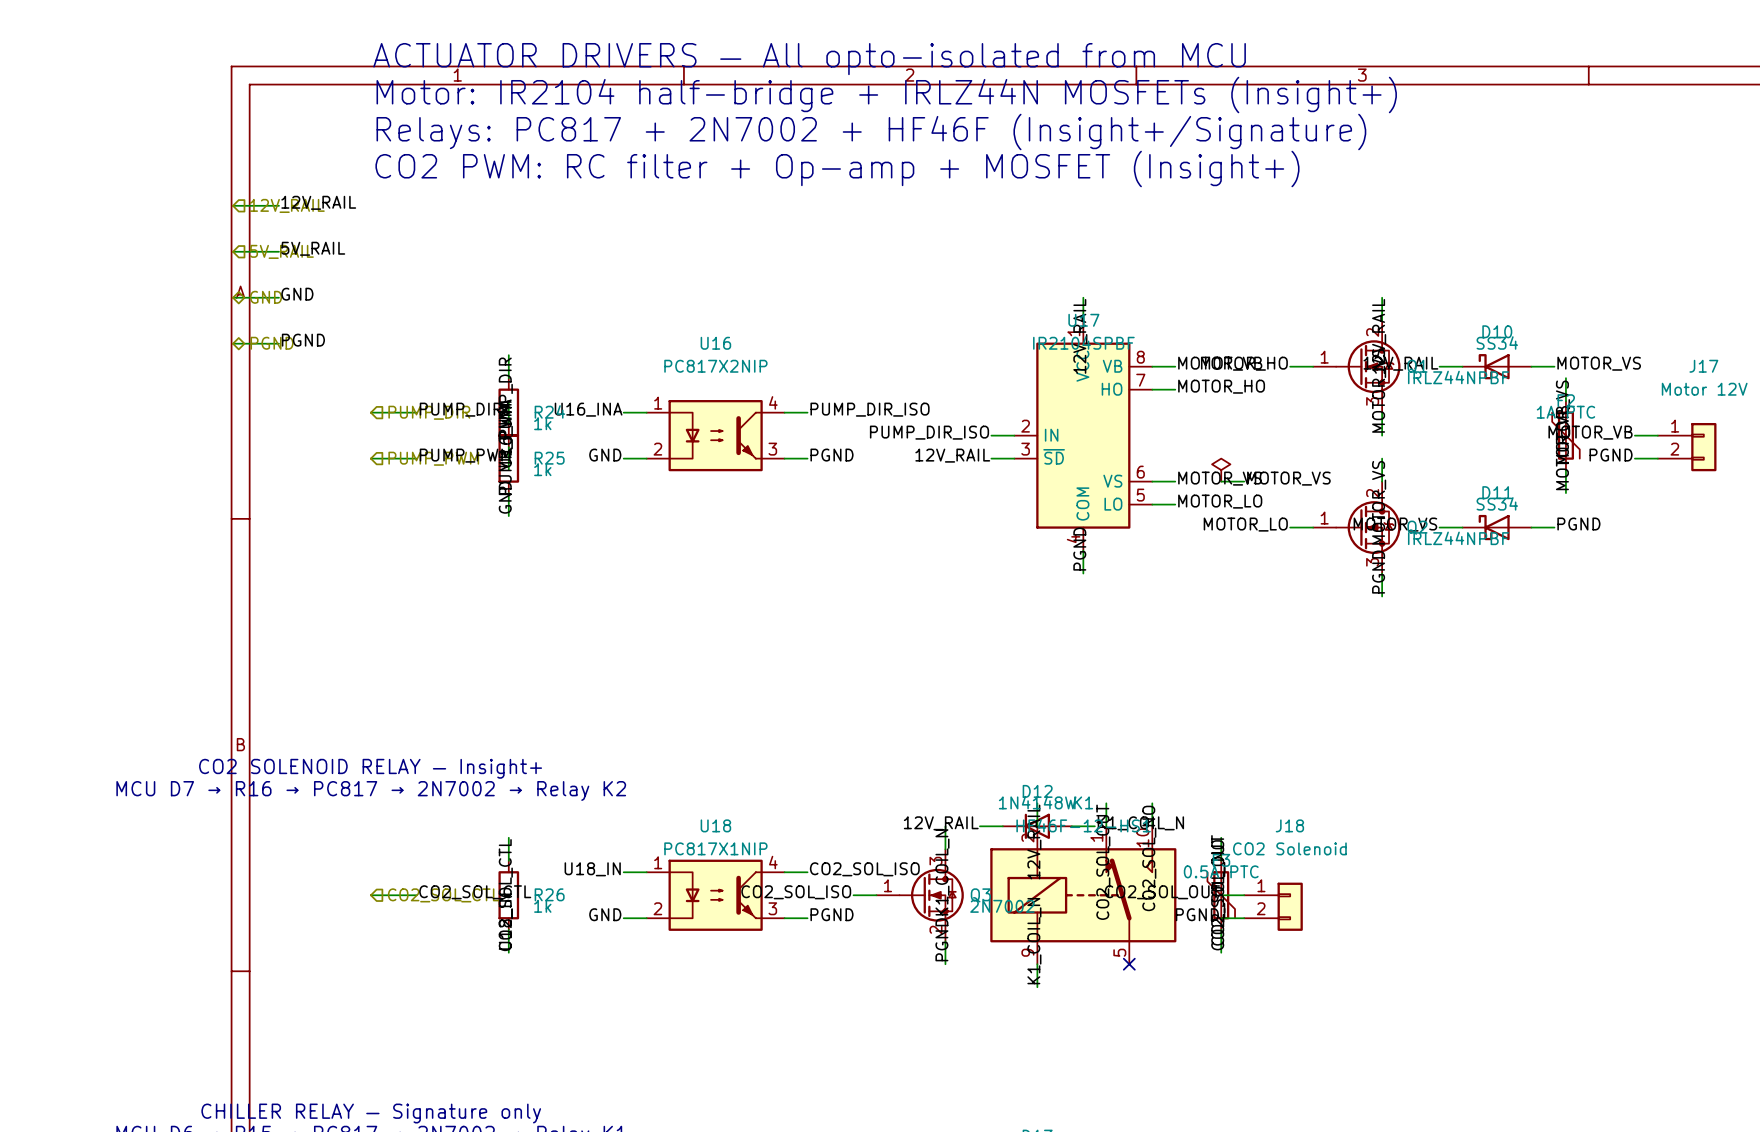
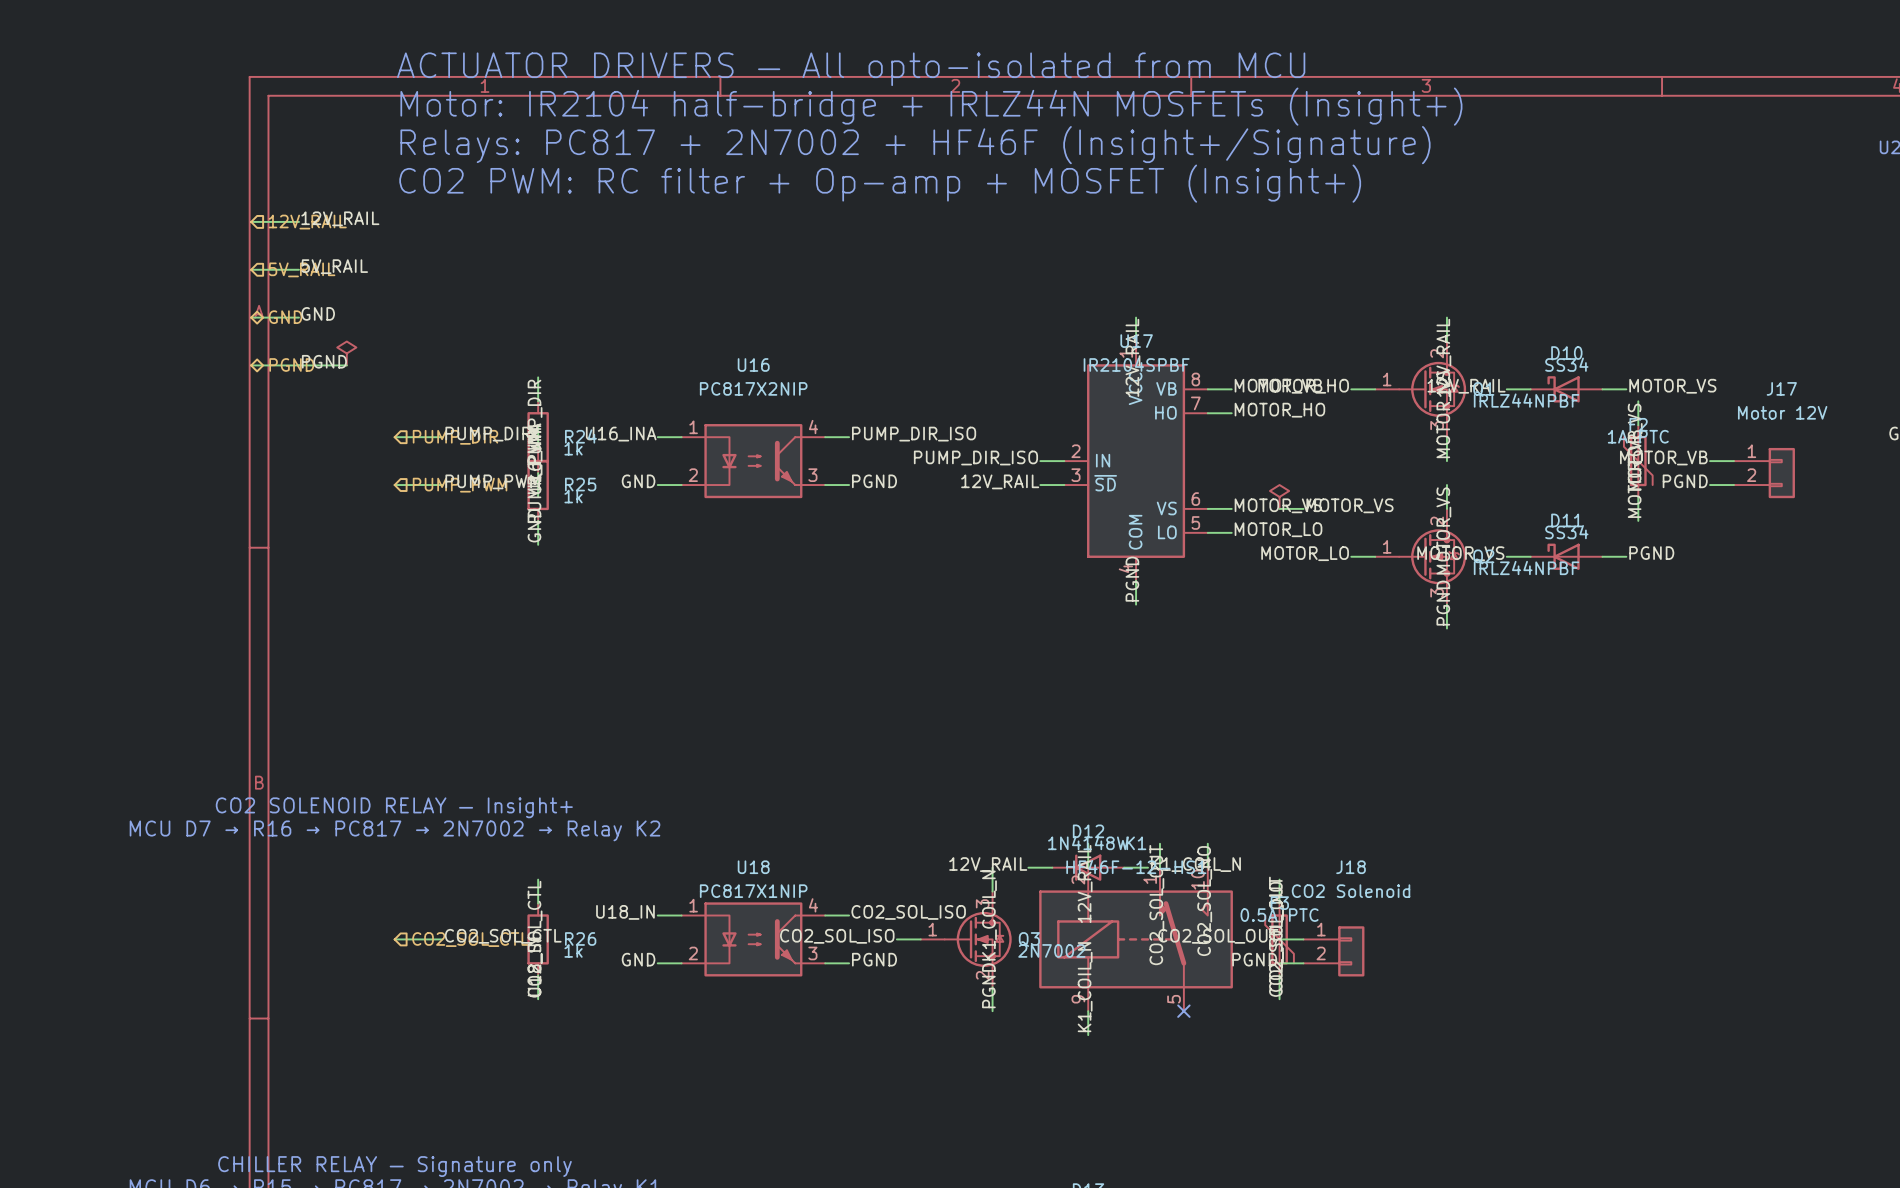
power symbol: none -> (346, 353)
wire: none -> (298, 365) (346, 365)

